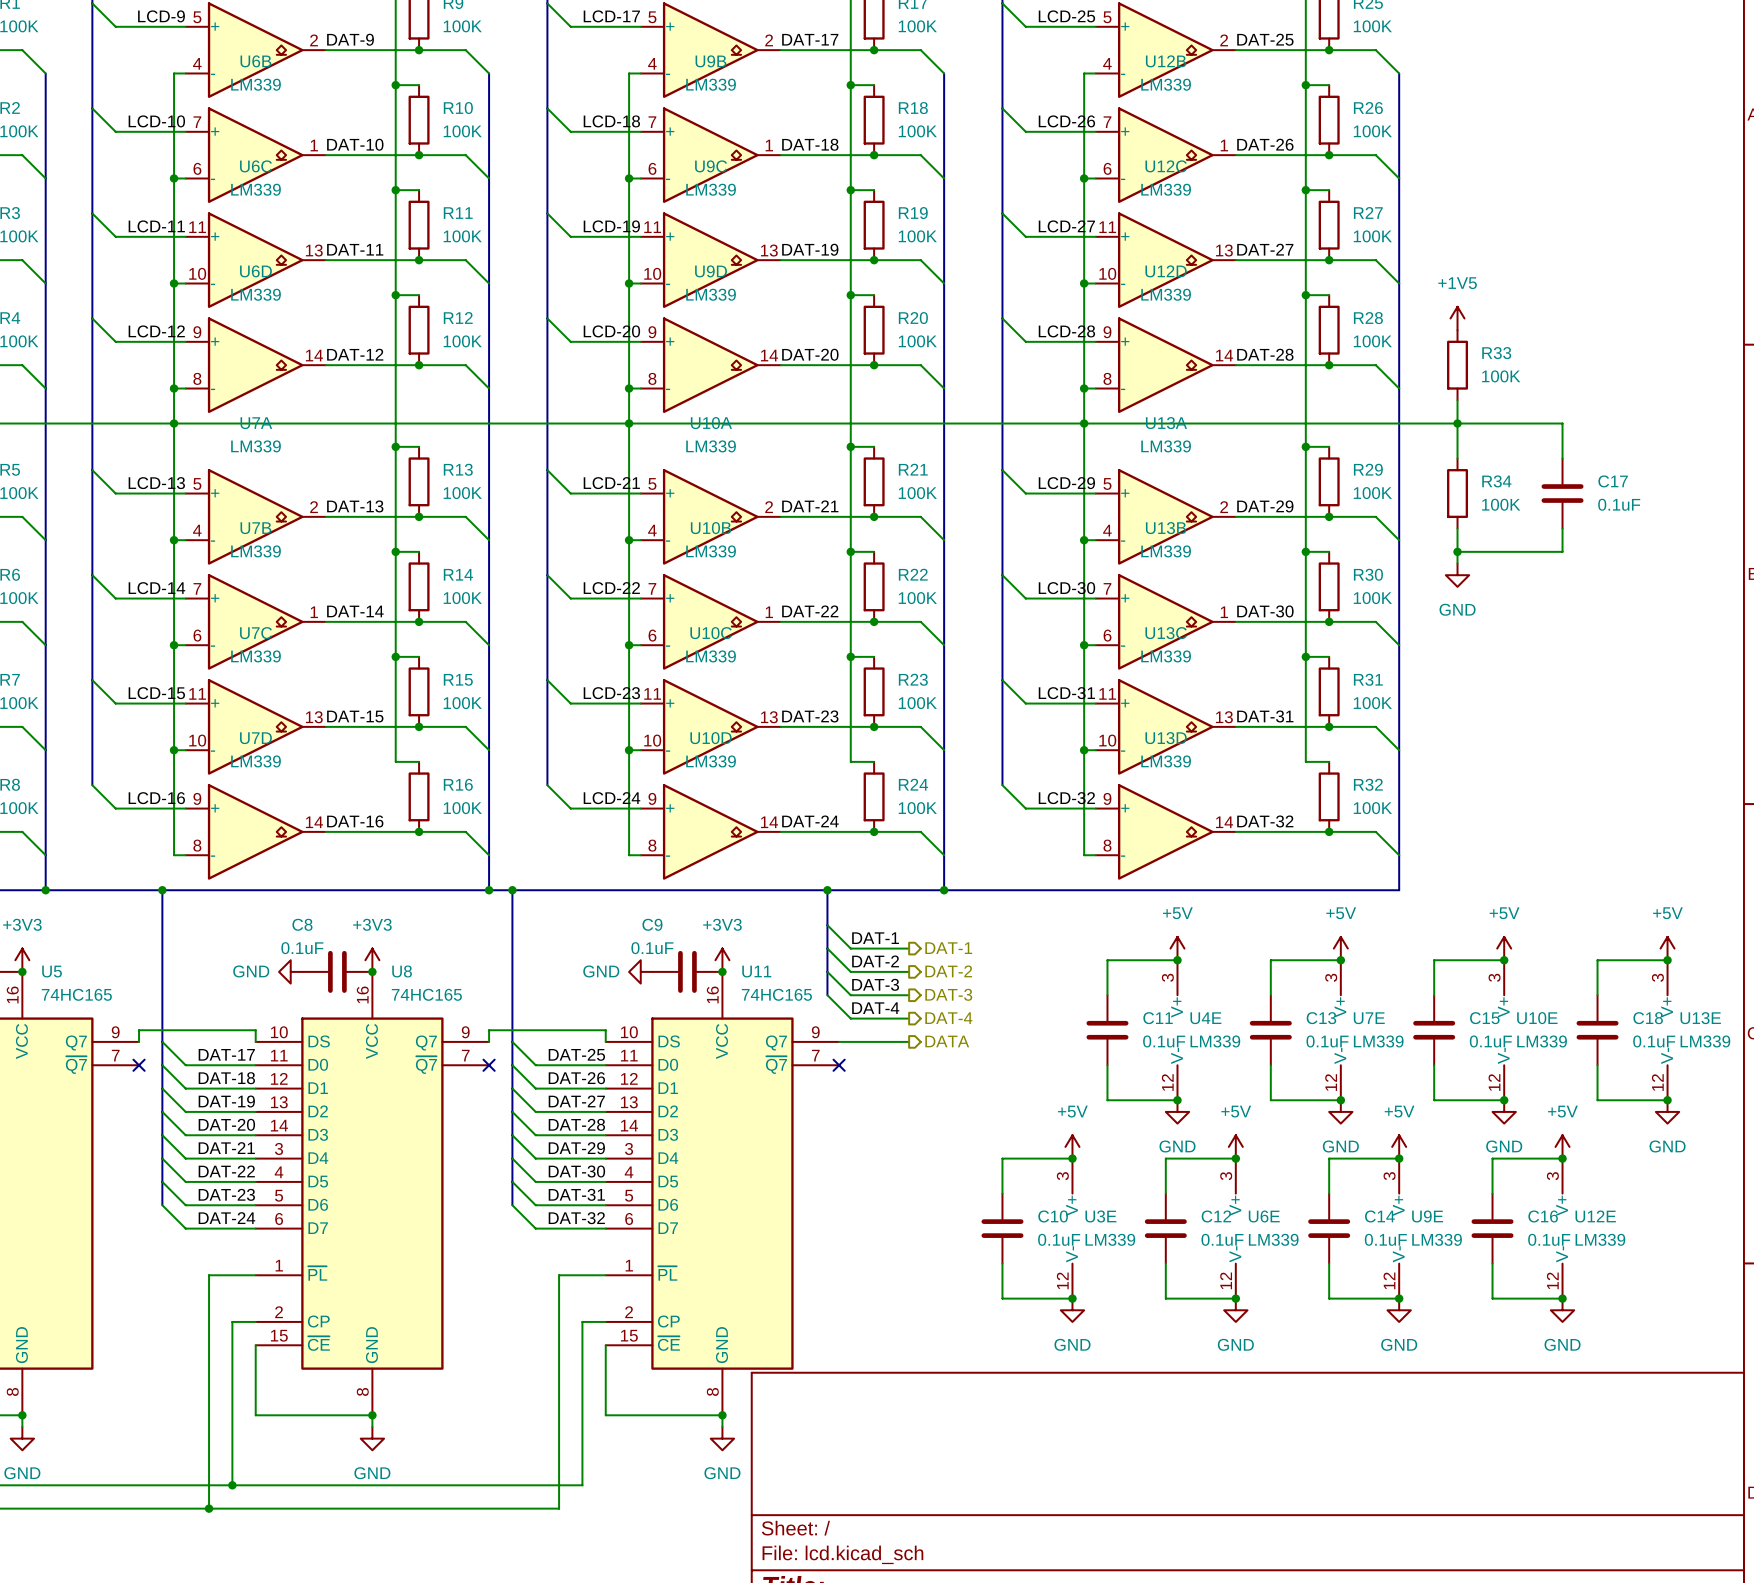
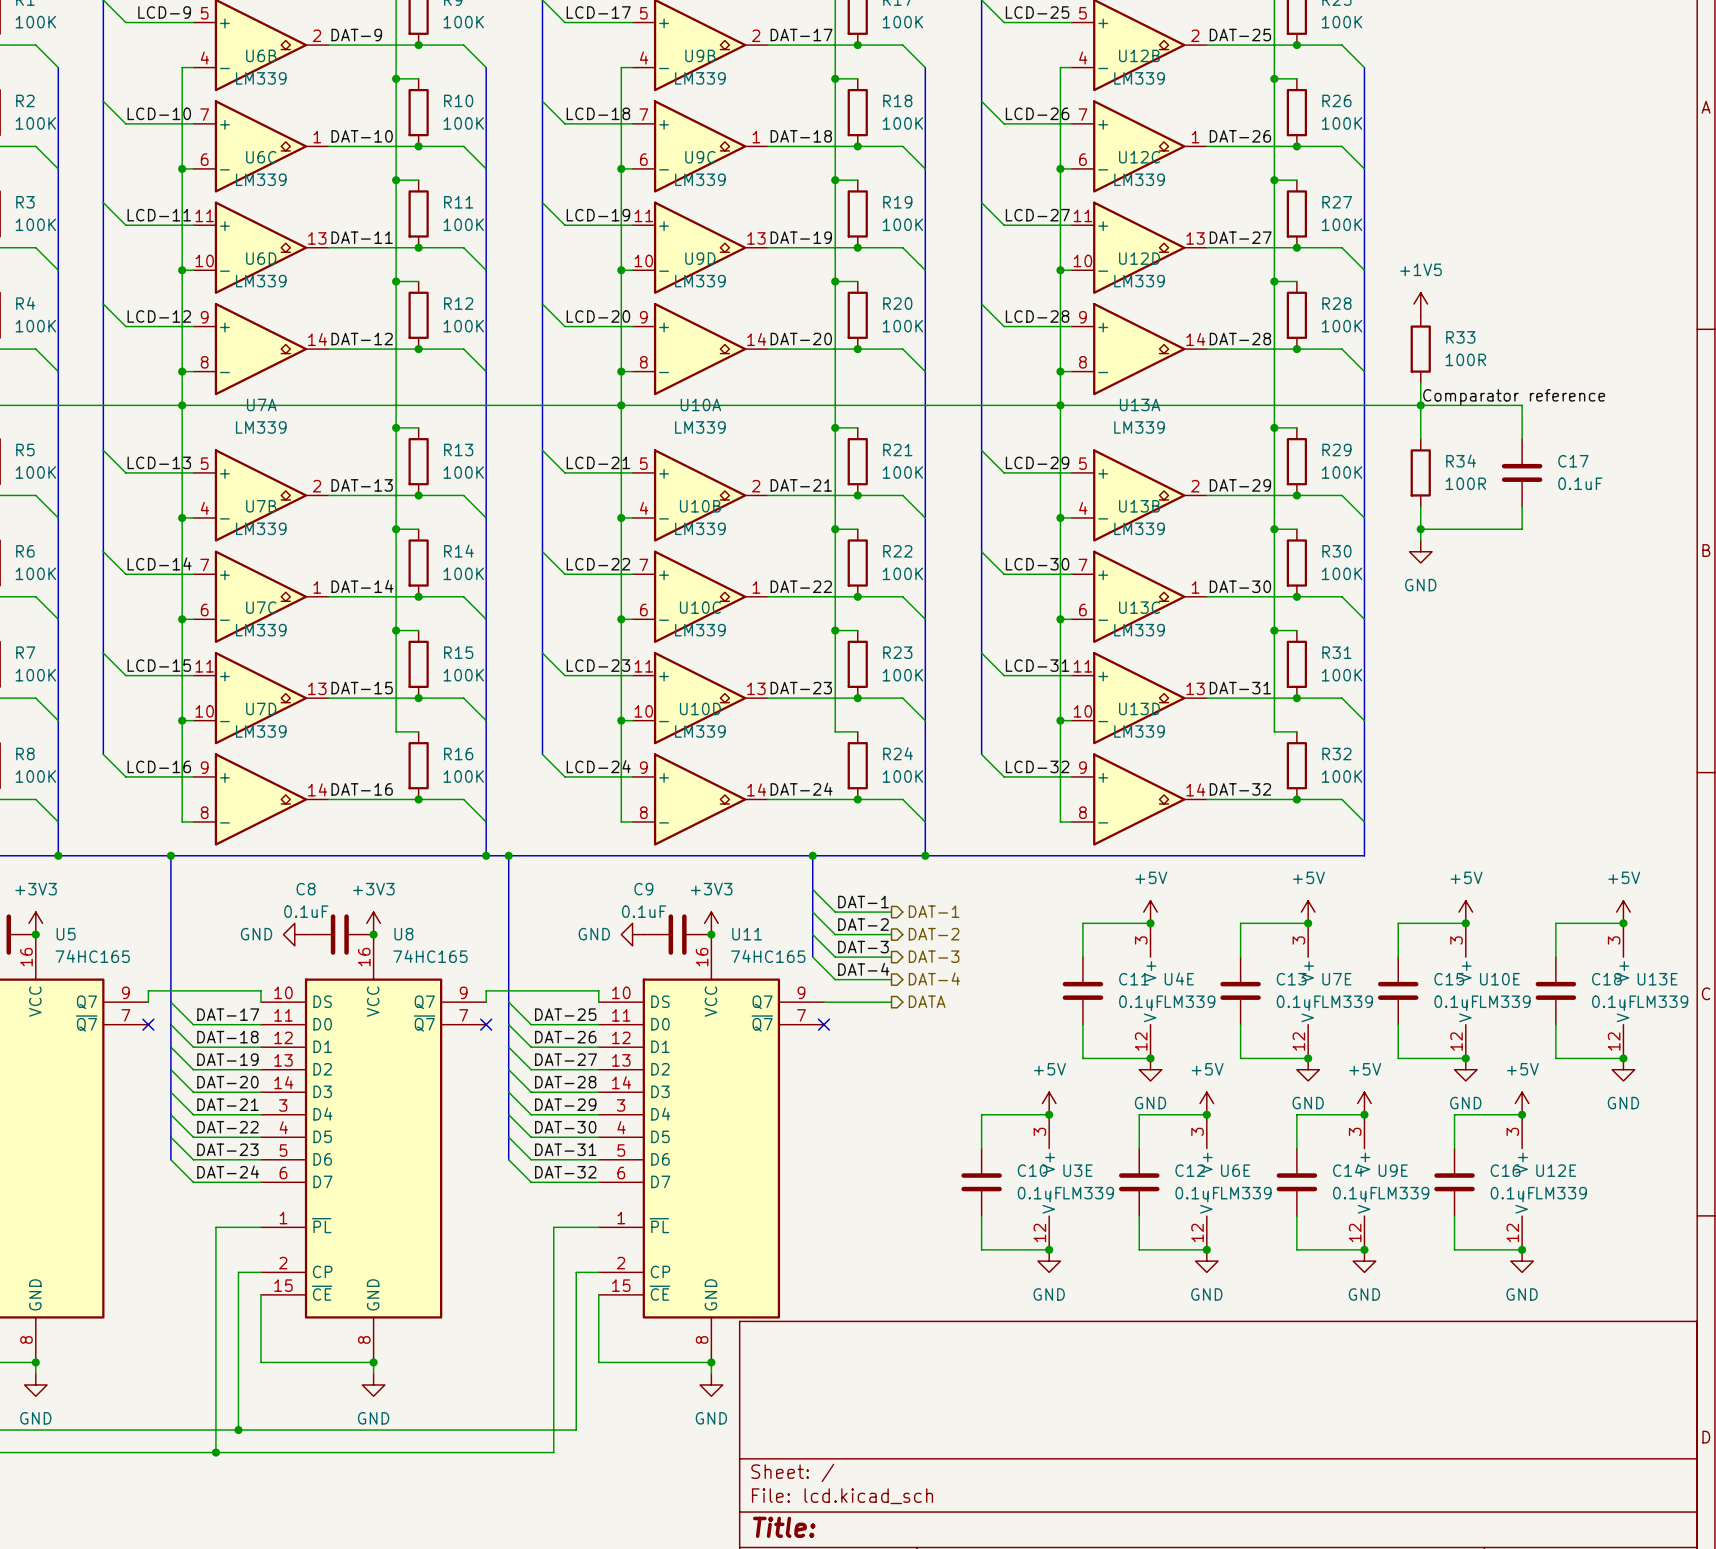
R33 value: 100K (1501, 376) -> 100R (1465, 359)
label: none -> Comparator reference (1514, 397)
R34 value: 100K (1501, 504) -> 100R (1465, 483)

